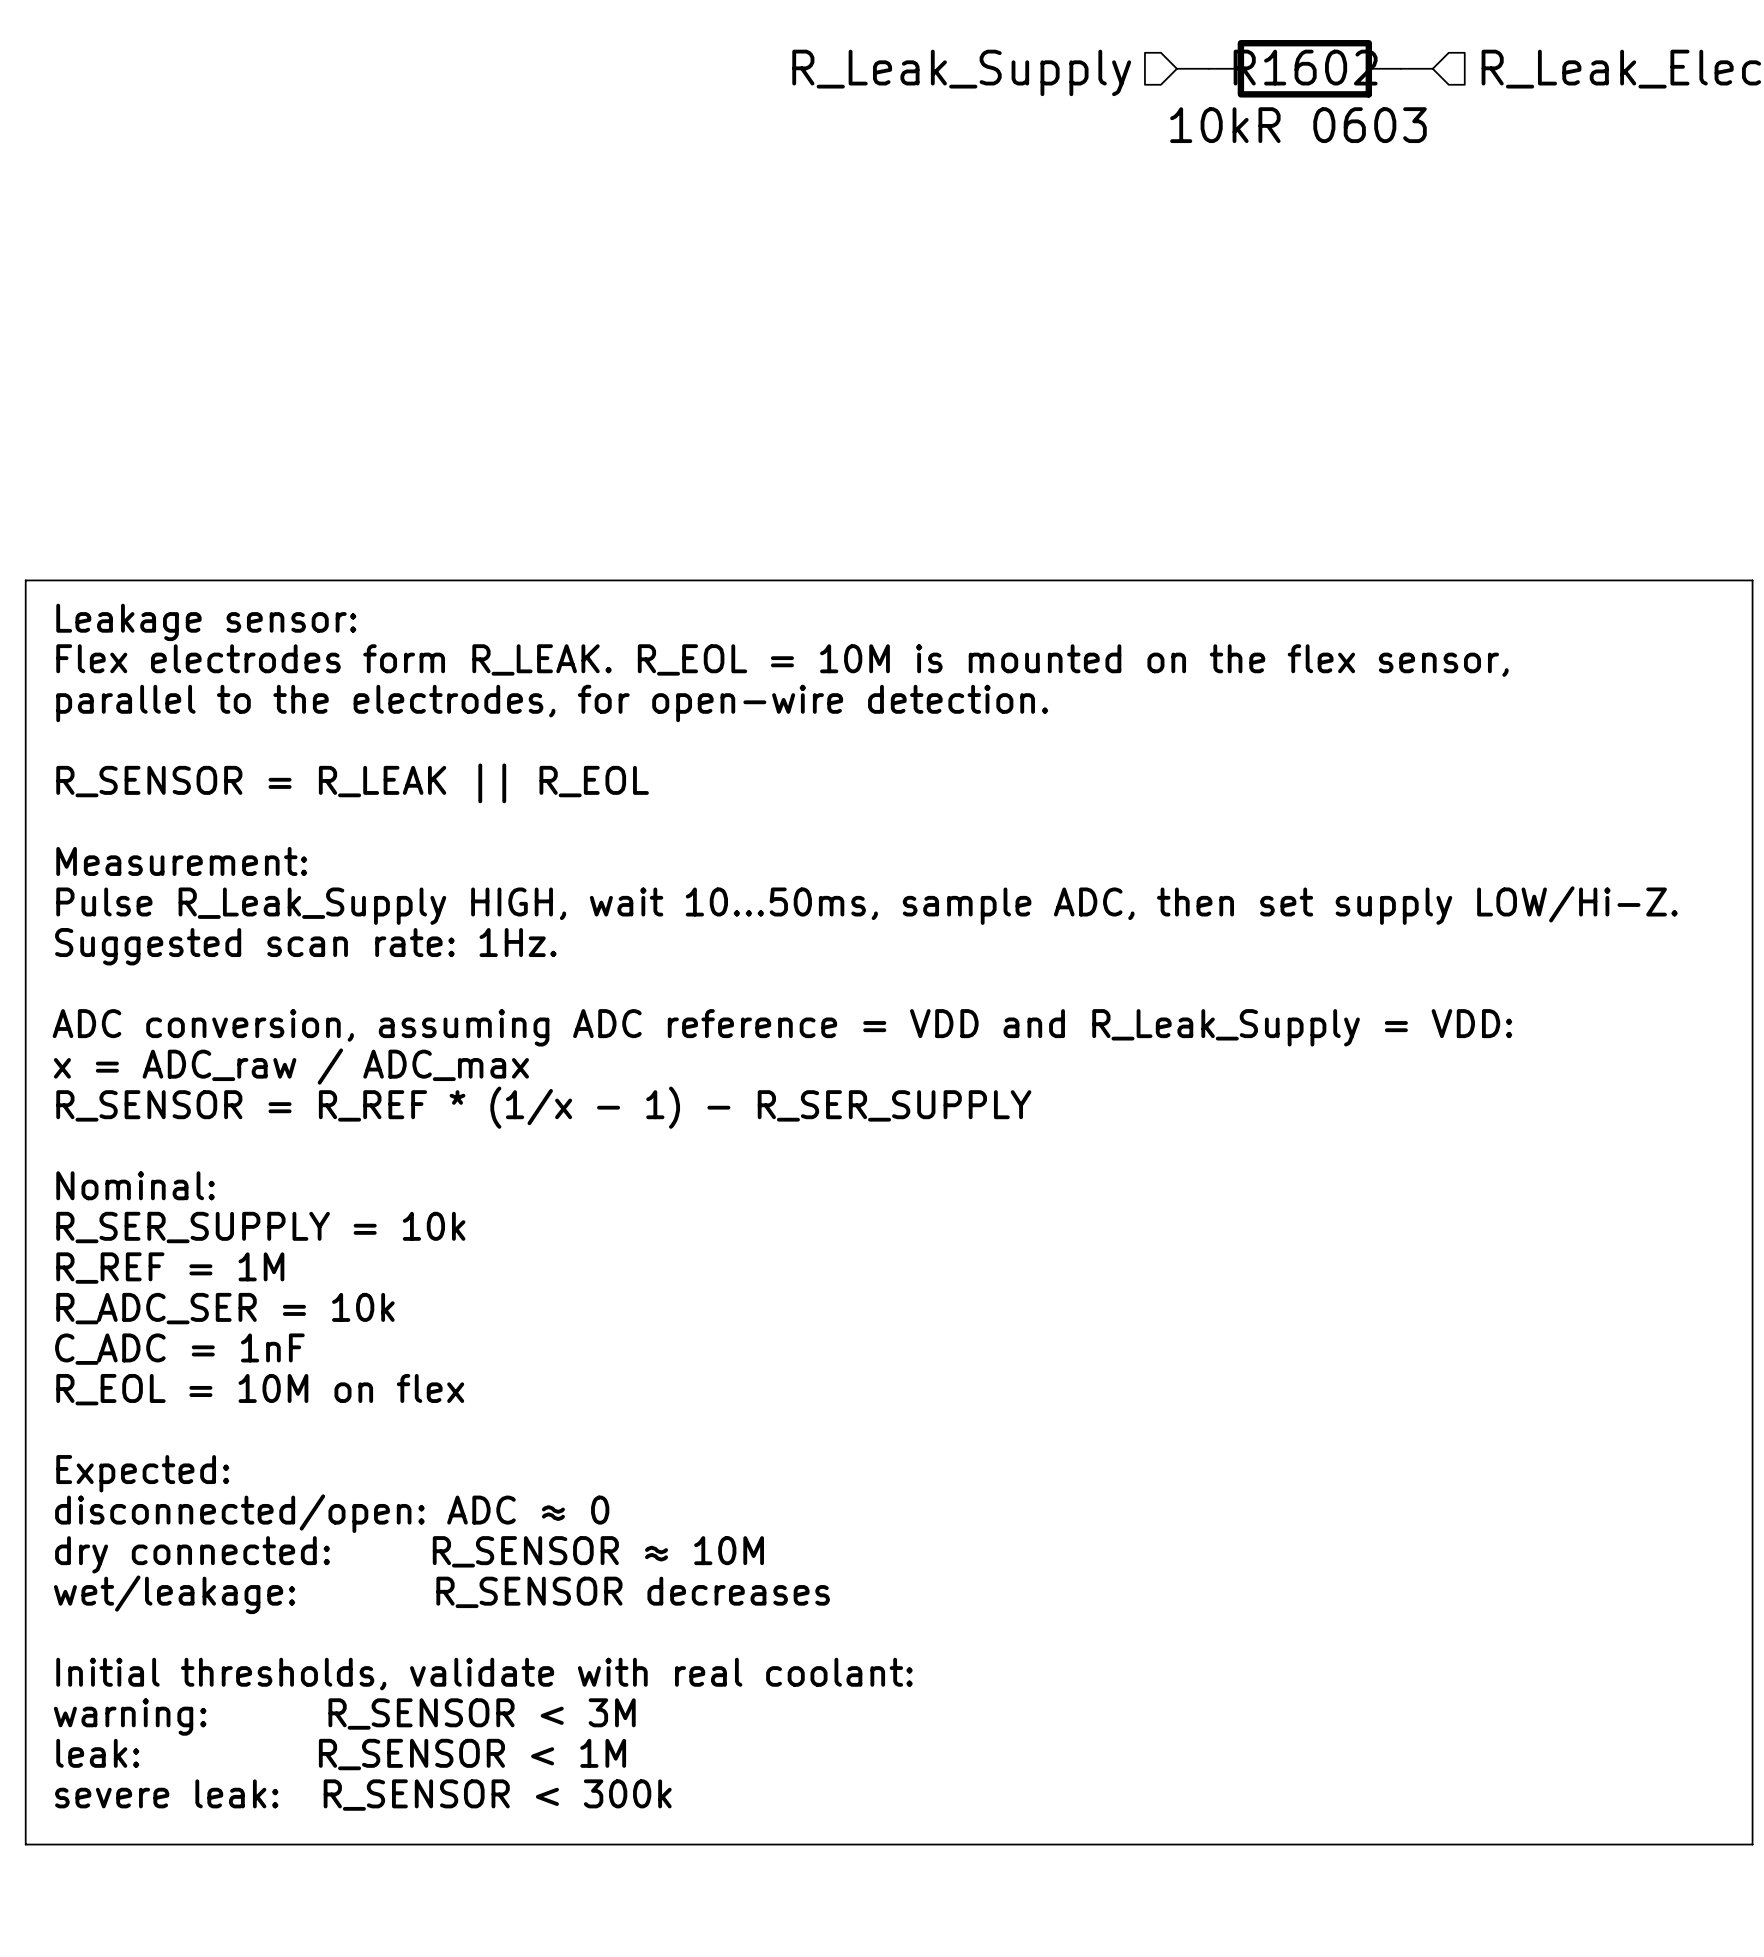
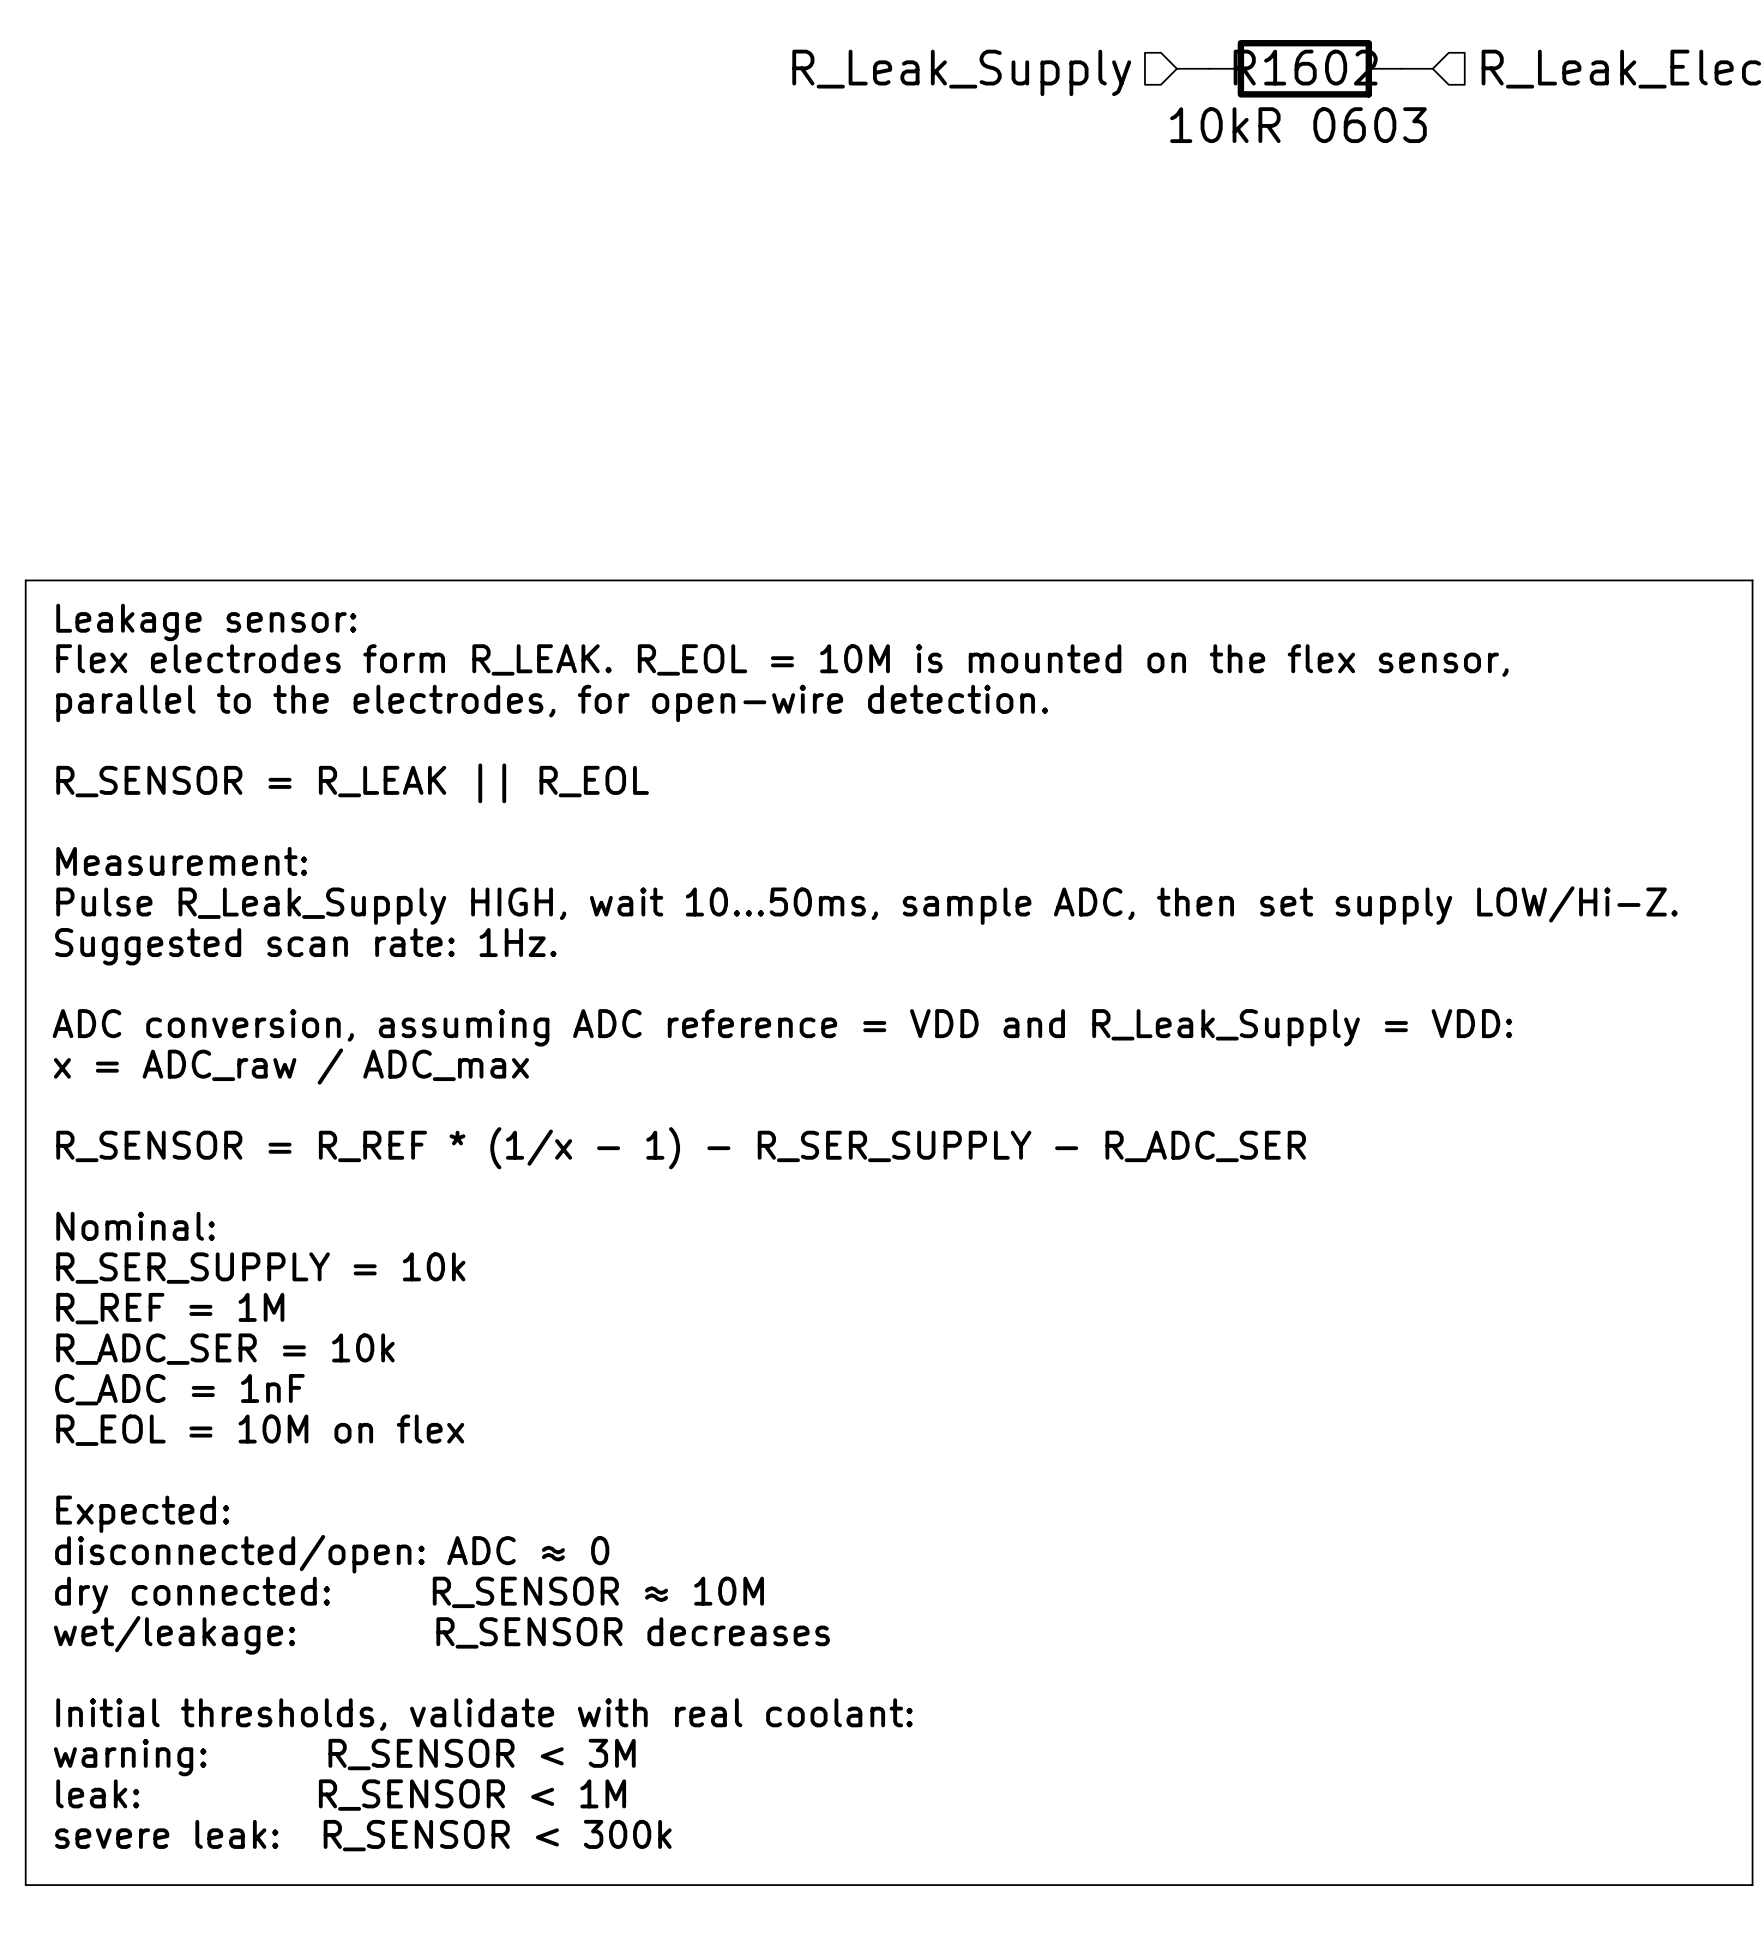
text: R_SENSOR = R_REF * (1/x - 1) - R_SER_SUPPLY (543, 1107) -> R_SENSOR = R_REF * (1/x - 1) - R_SER_SUPPLY - R_ADC_SER (681, 1148)
text: Nominal: (135, 1185) -> none
text: R_SER_SUPPLY = 10k (260, 1227) -> Nominal: (135, 1226)
text: R_REF = 1M (170, 1268) -> R_SER_SUPPLY = 10k (260, 1268)
text: R_ADC_SER = 10k (225, 1308) -> R_REF = 1M (170, 1308)
text: C_ADC = 1nF (179, 1349) -> R_ADC_SER = 10k (225, 1349)
text: R_EOL = 10M on flex (260, 1389) -> C_ADC = 1nF (179, 1389)
text: none -> R_EOL = 10M on flex (260, 1430)
text: Expected: (142, 1473) -> none
text: disconnected/open: ADC ≈ 0 (332, 1513) -> Expected: (142, 1514)
text: dry connected: R_SENSOR ≈ 10M (409, 1554) -> disconnected/open: ADC ≈ 0 (332, 1554)
text: wet/leakage: R_SENSOR decreases (441, 1594) -> dry connected: R_SENSOR ≈ 10M (409, 1595)
text: none -> wet/leakage: R_SENSOR decreases (441, 1635)
text: Initial thresholds, validate with real coolant: (484, 1674) -> none
text: warning: R_SENSOR < 3M (344, 1716) -> Initial thresholds, validate with real coolant: (484, 1714)
text: leak: R_SENSOR < 1M (341, 1754) -> warning: R_SENSOR < 3M (344, 1757)
text: severe leak: R_SENSOR < 300k (363, 1795) -> leak: R_SENSOR < 1M (341, 1795)
text: none -> severe leak: R_SENSOR < 300k (363, 1835)
line: (25, 1844) (1752, 1844) -> (25, 1844) (25, 1885) (1752, 1885) (1752, 1844)

